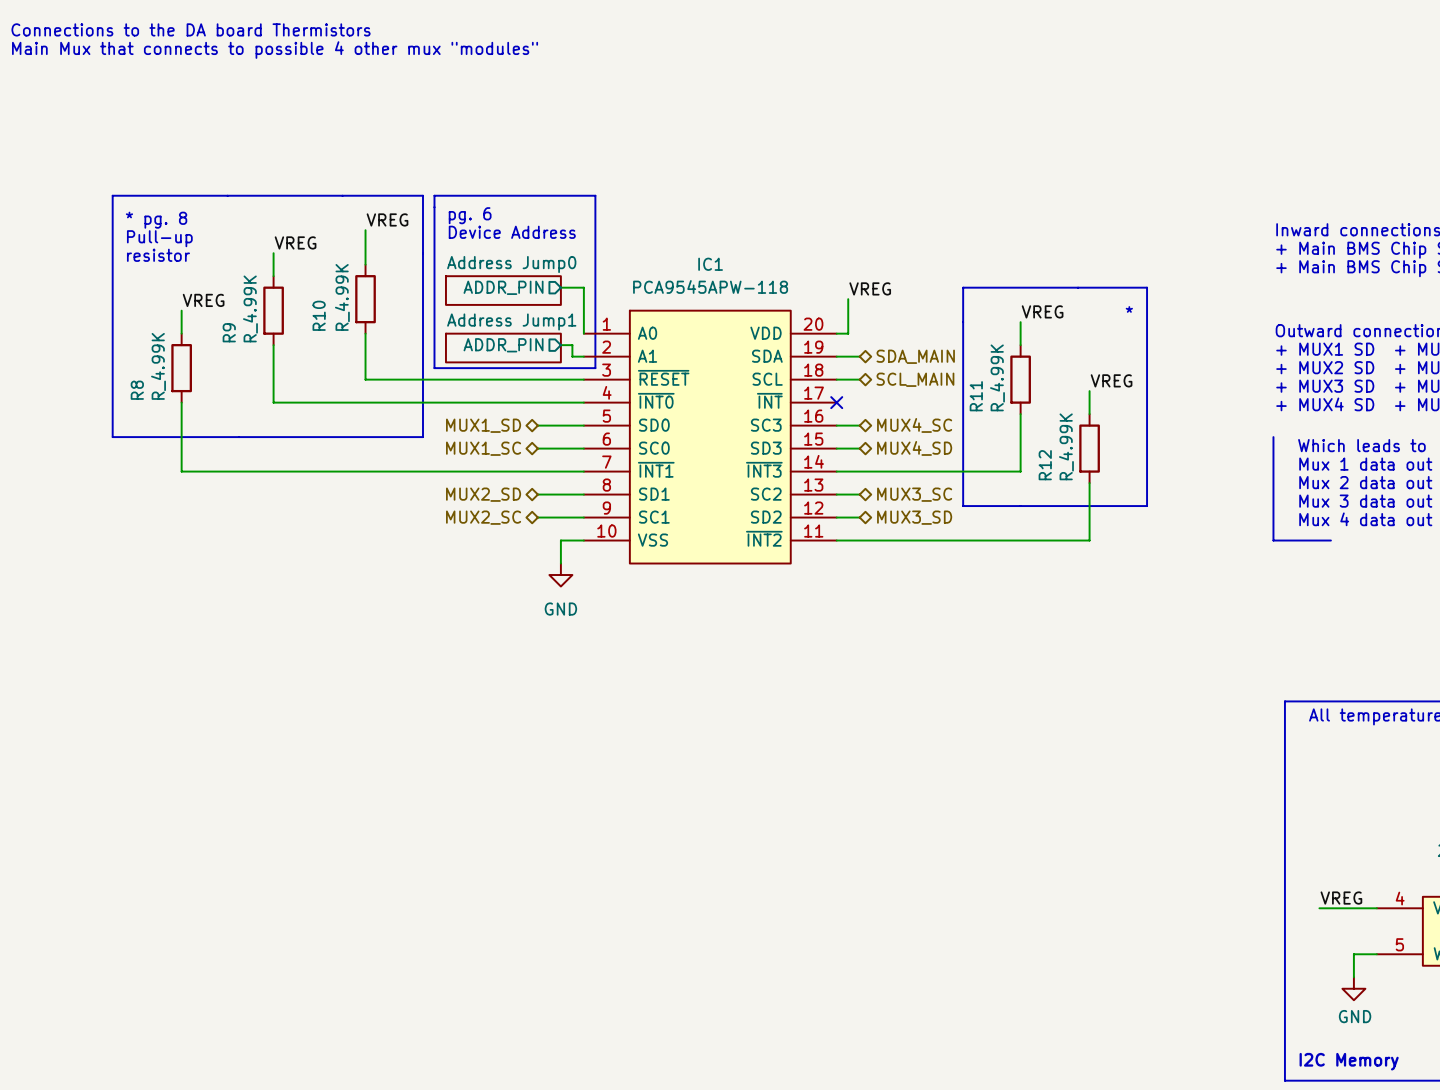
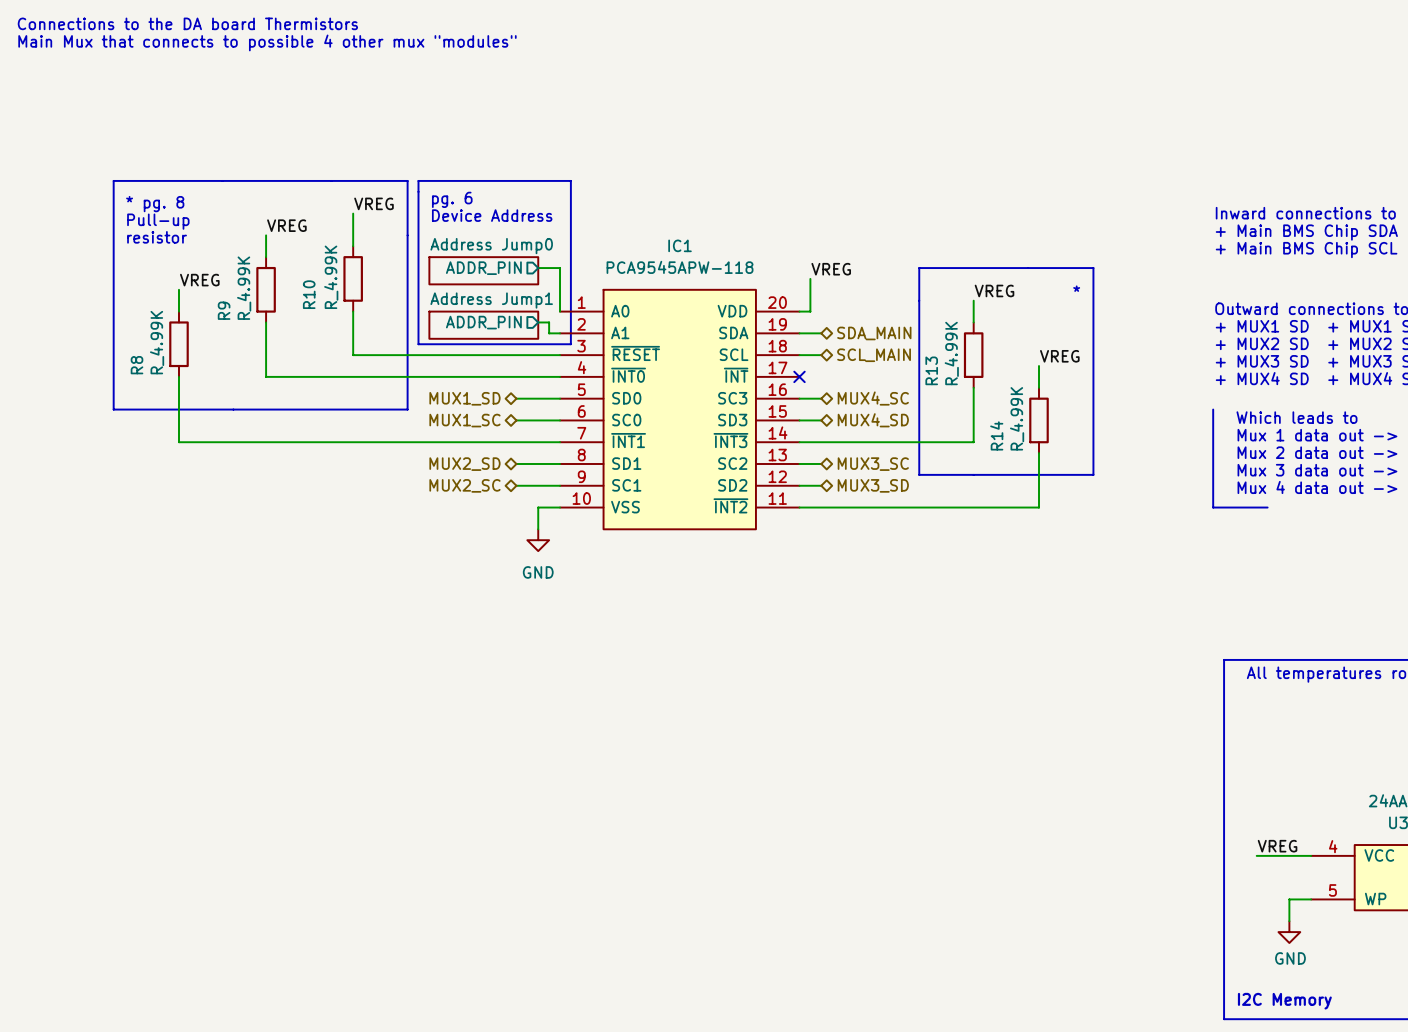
R11 name: R11 (976, 396) -> R13 (931, 370)
R12 name: R12 (1045, 465) -> R14 (996, 435)

